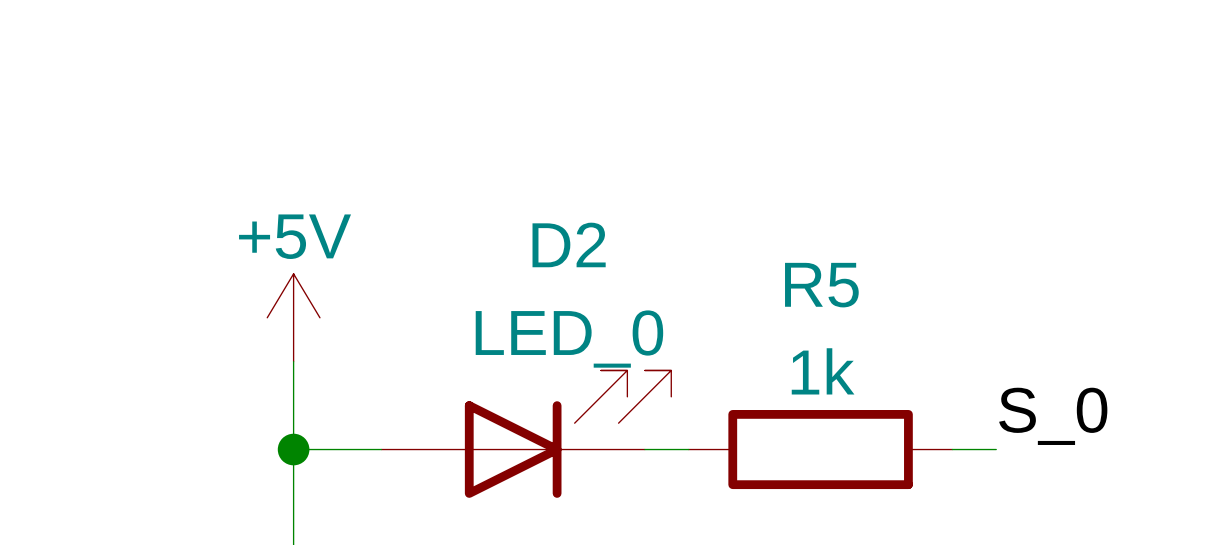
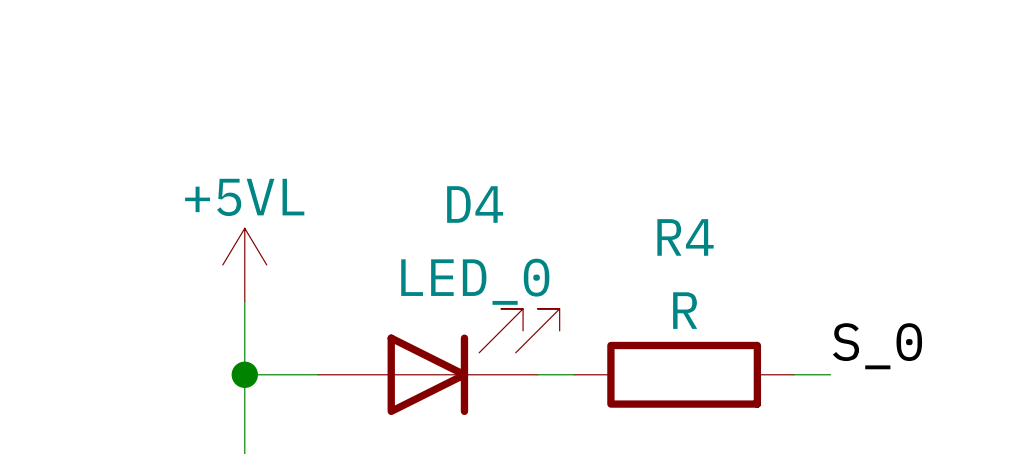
D2 name: D2 (569, 244) -> D4 (475, 204)
R5 name: R5 (821, 285) -> R4 (685, 237)
power symbol: +5V (293, 317) -> +5VL (244, 264)
R5 value: 1k (823, 371) -> R (685, 310)

